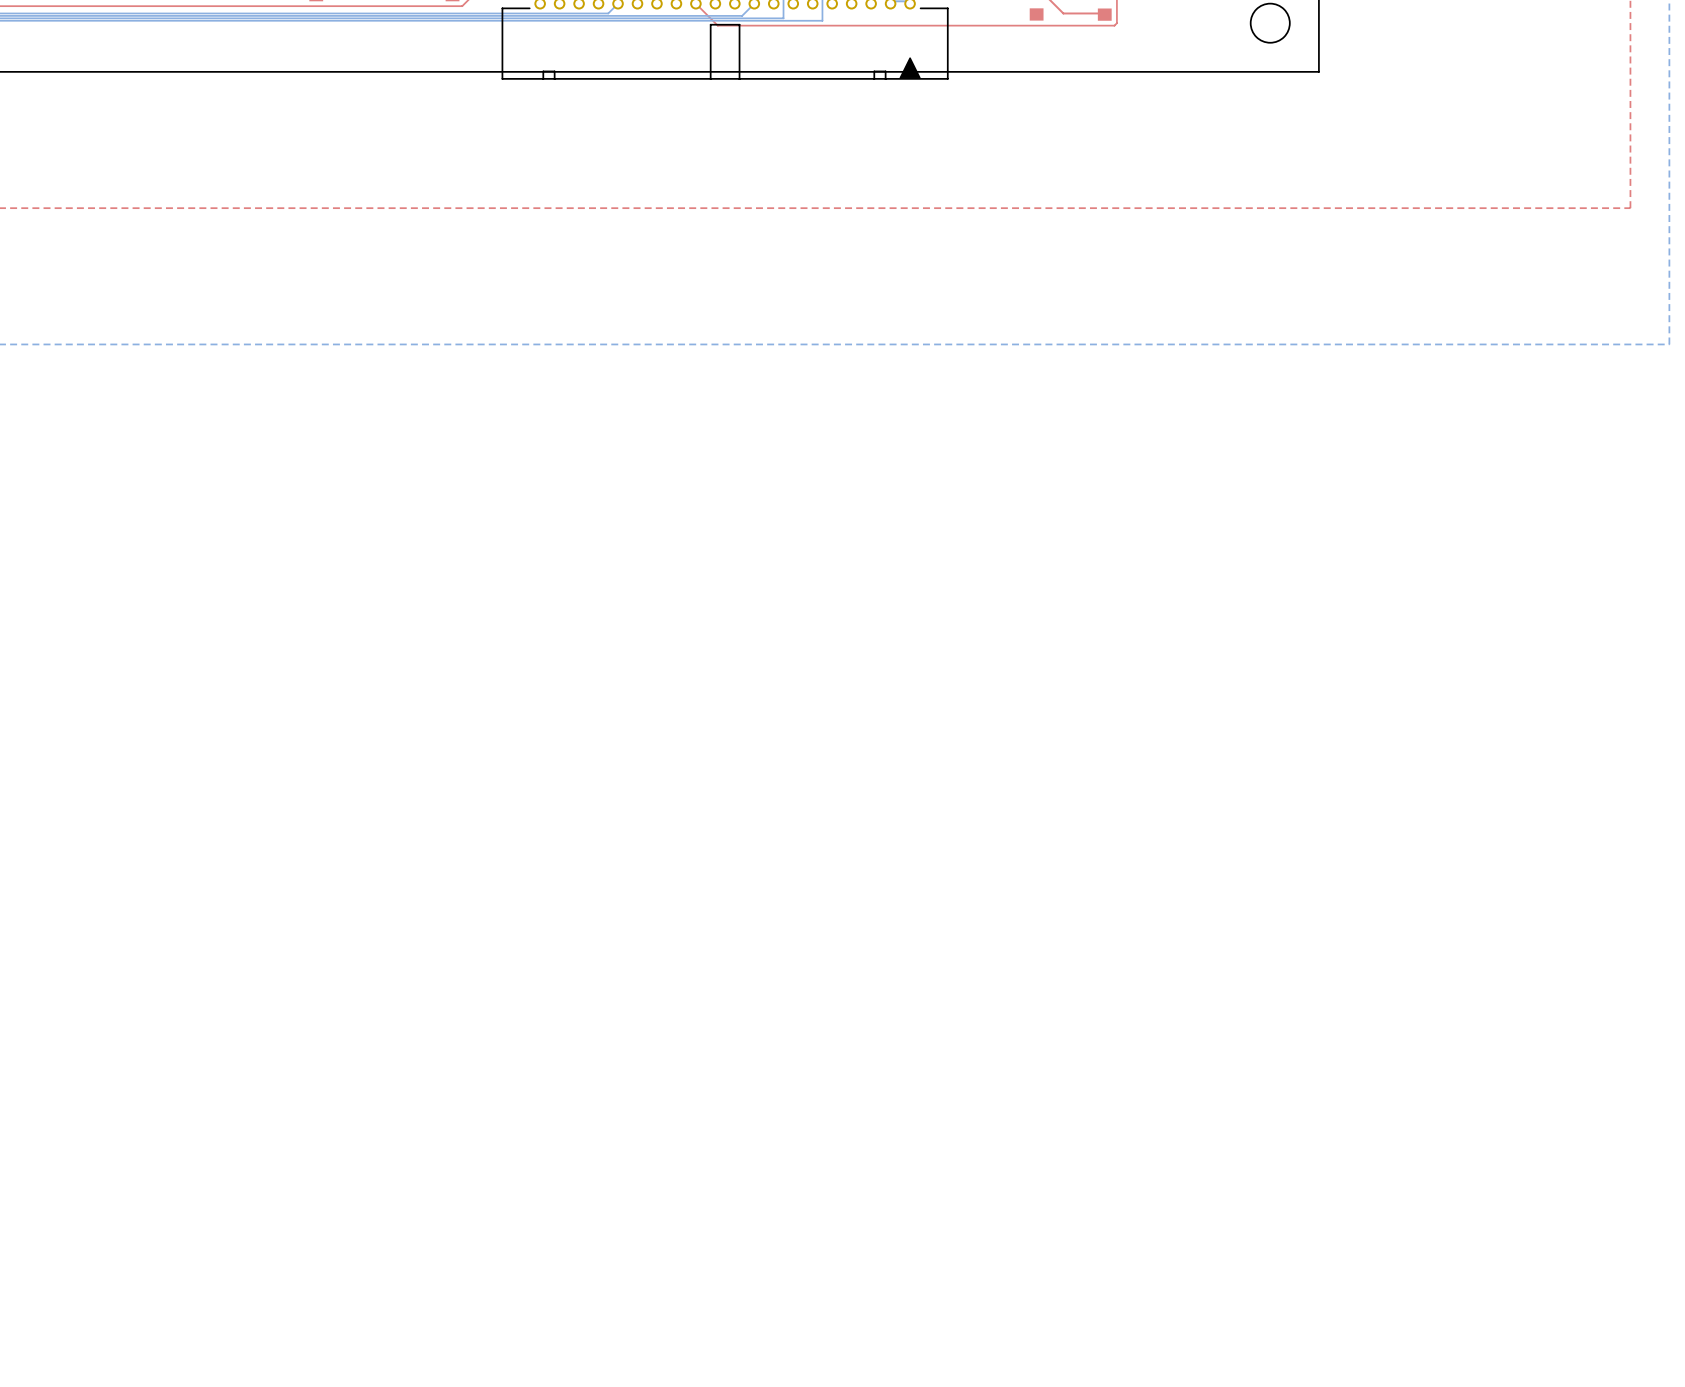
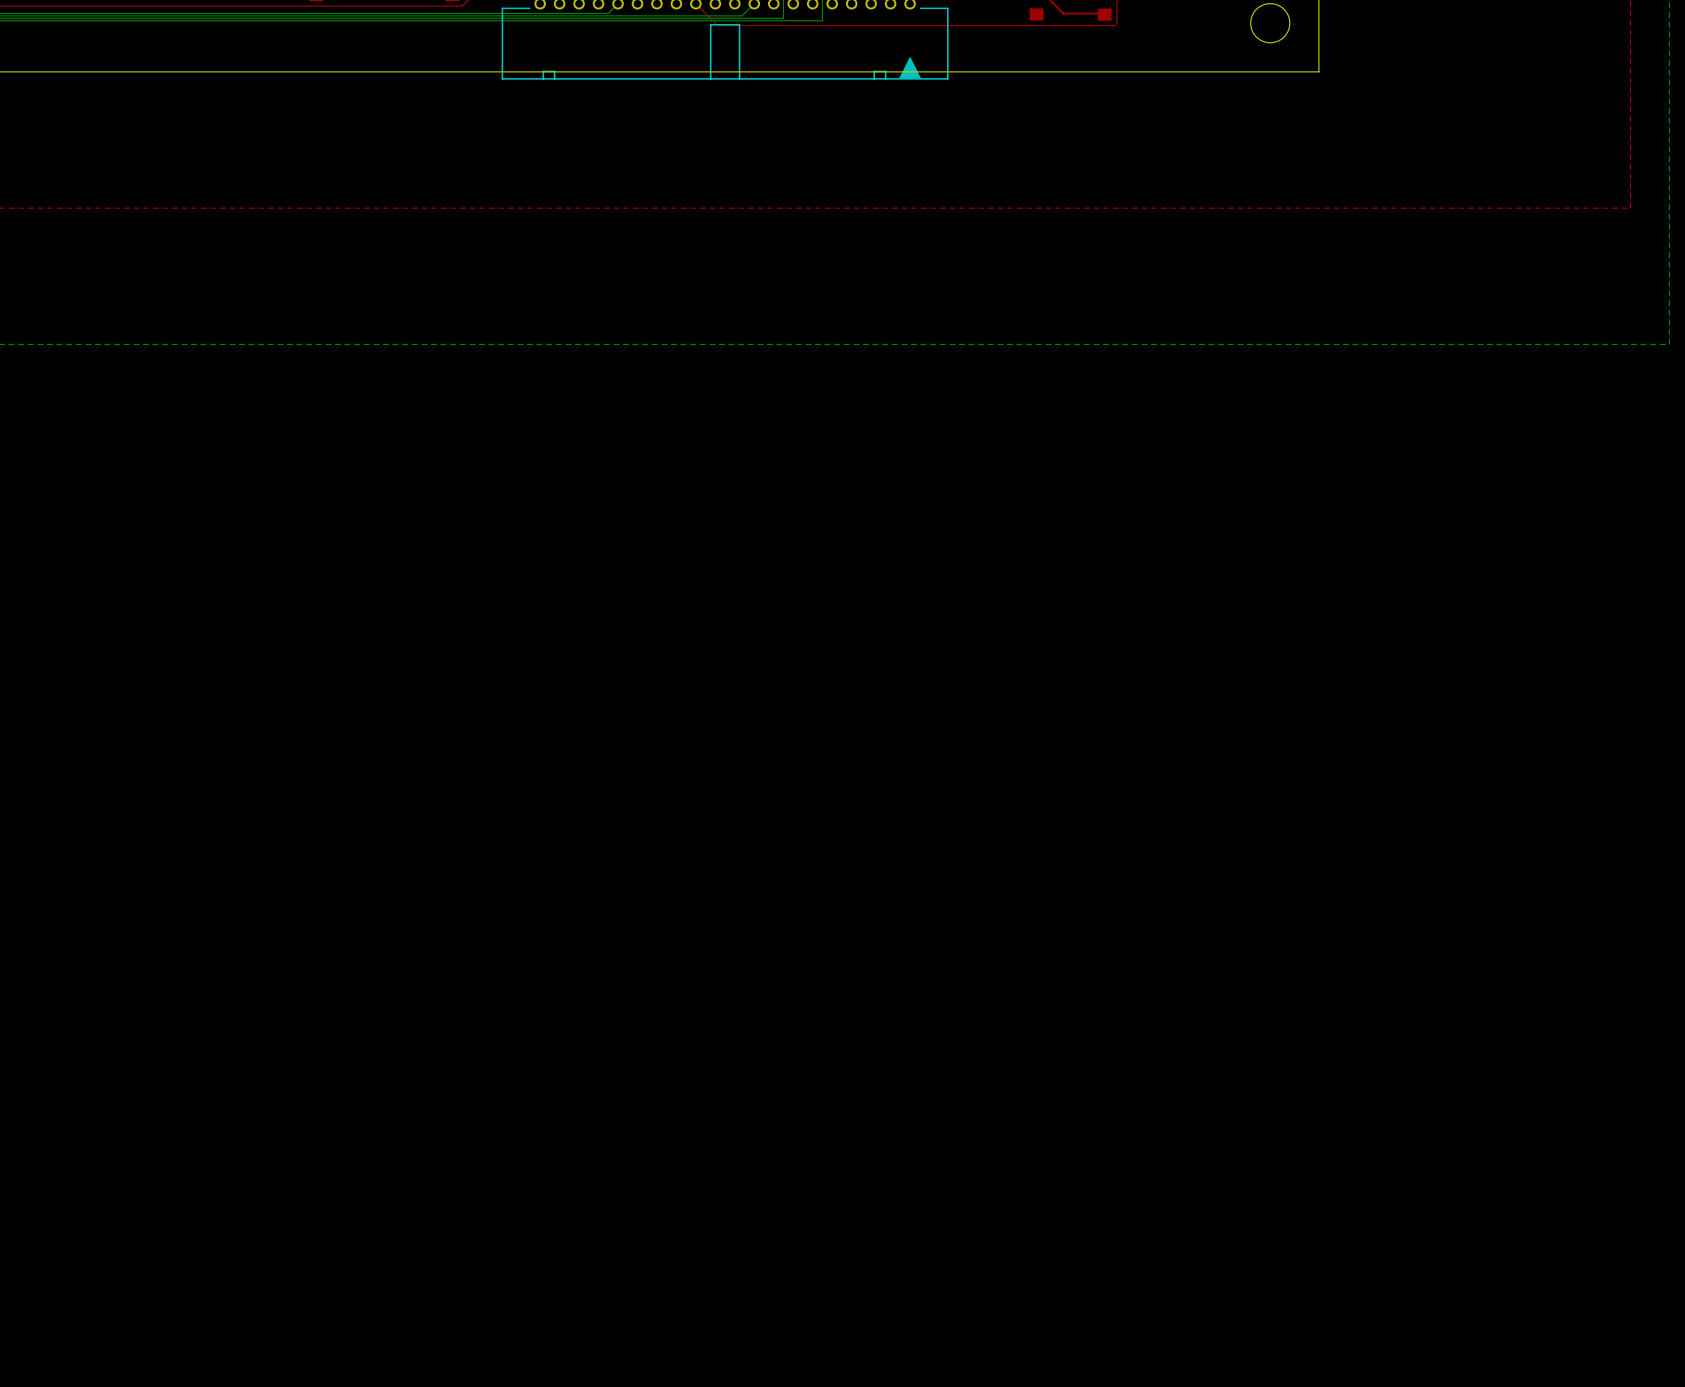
bottom track: (910, 3) (907, 1) (893, 1) (890, 3) -> none

